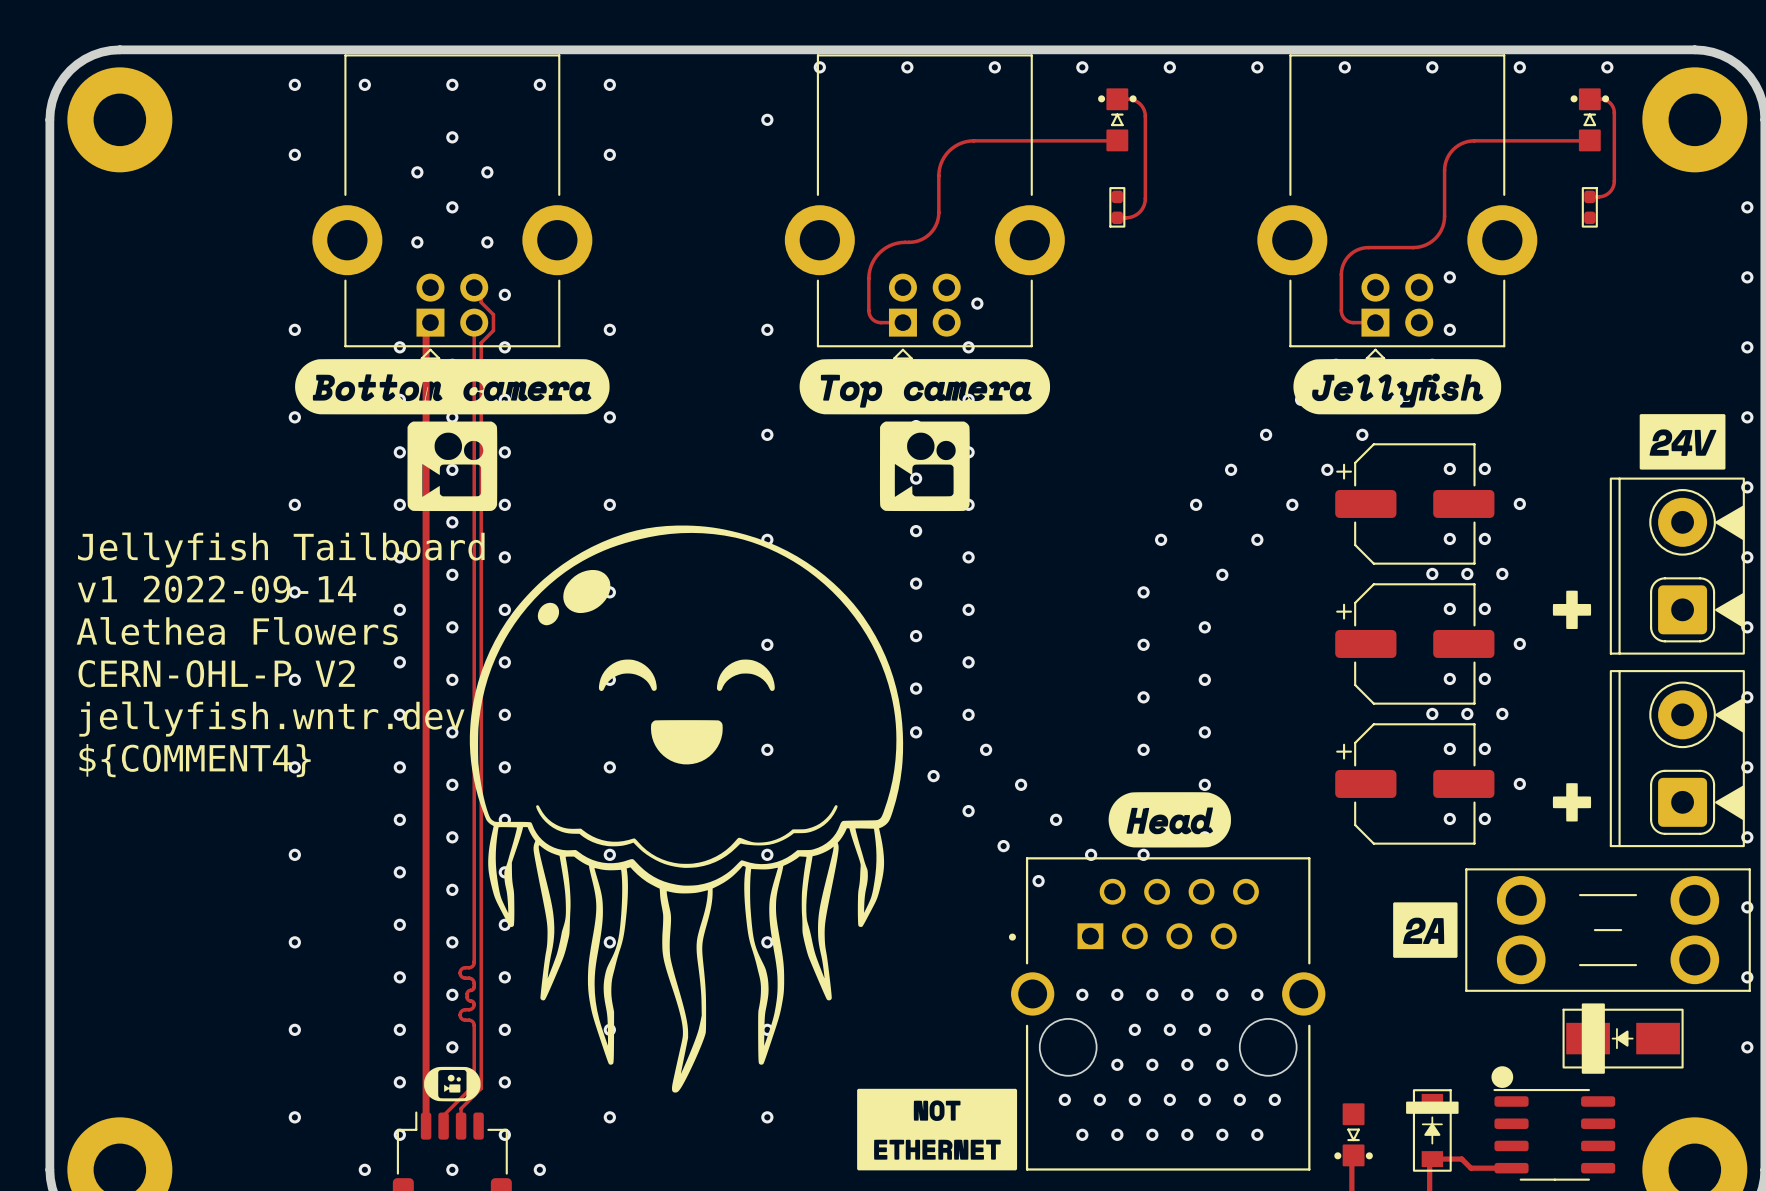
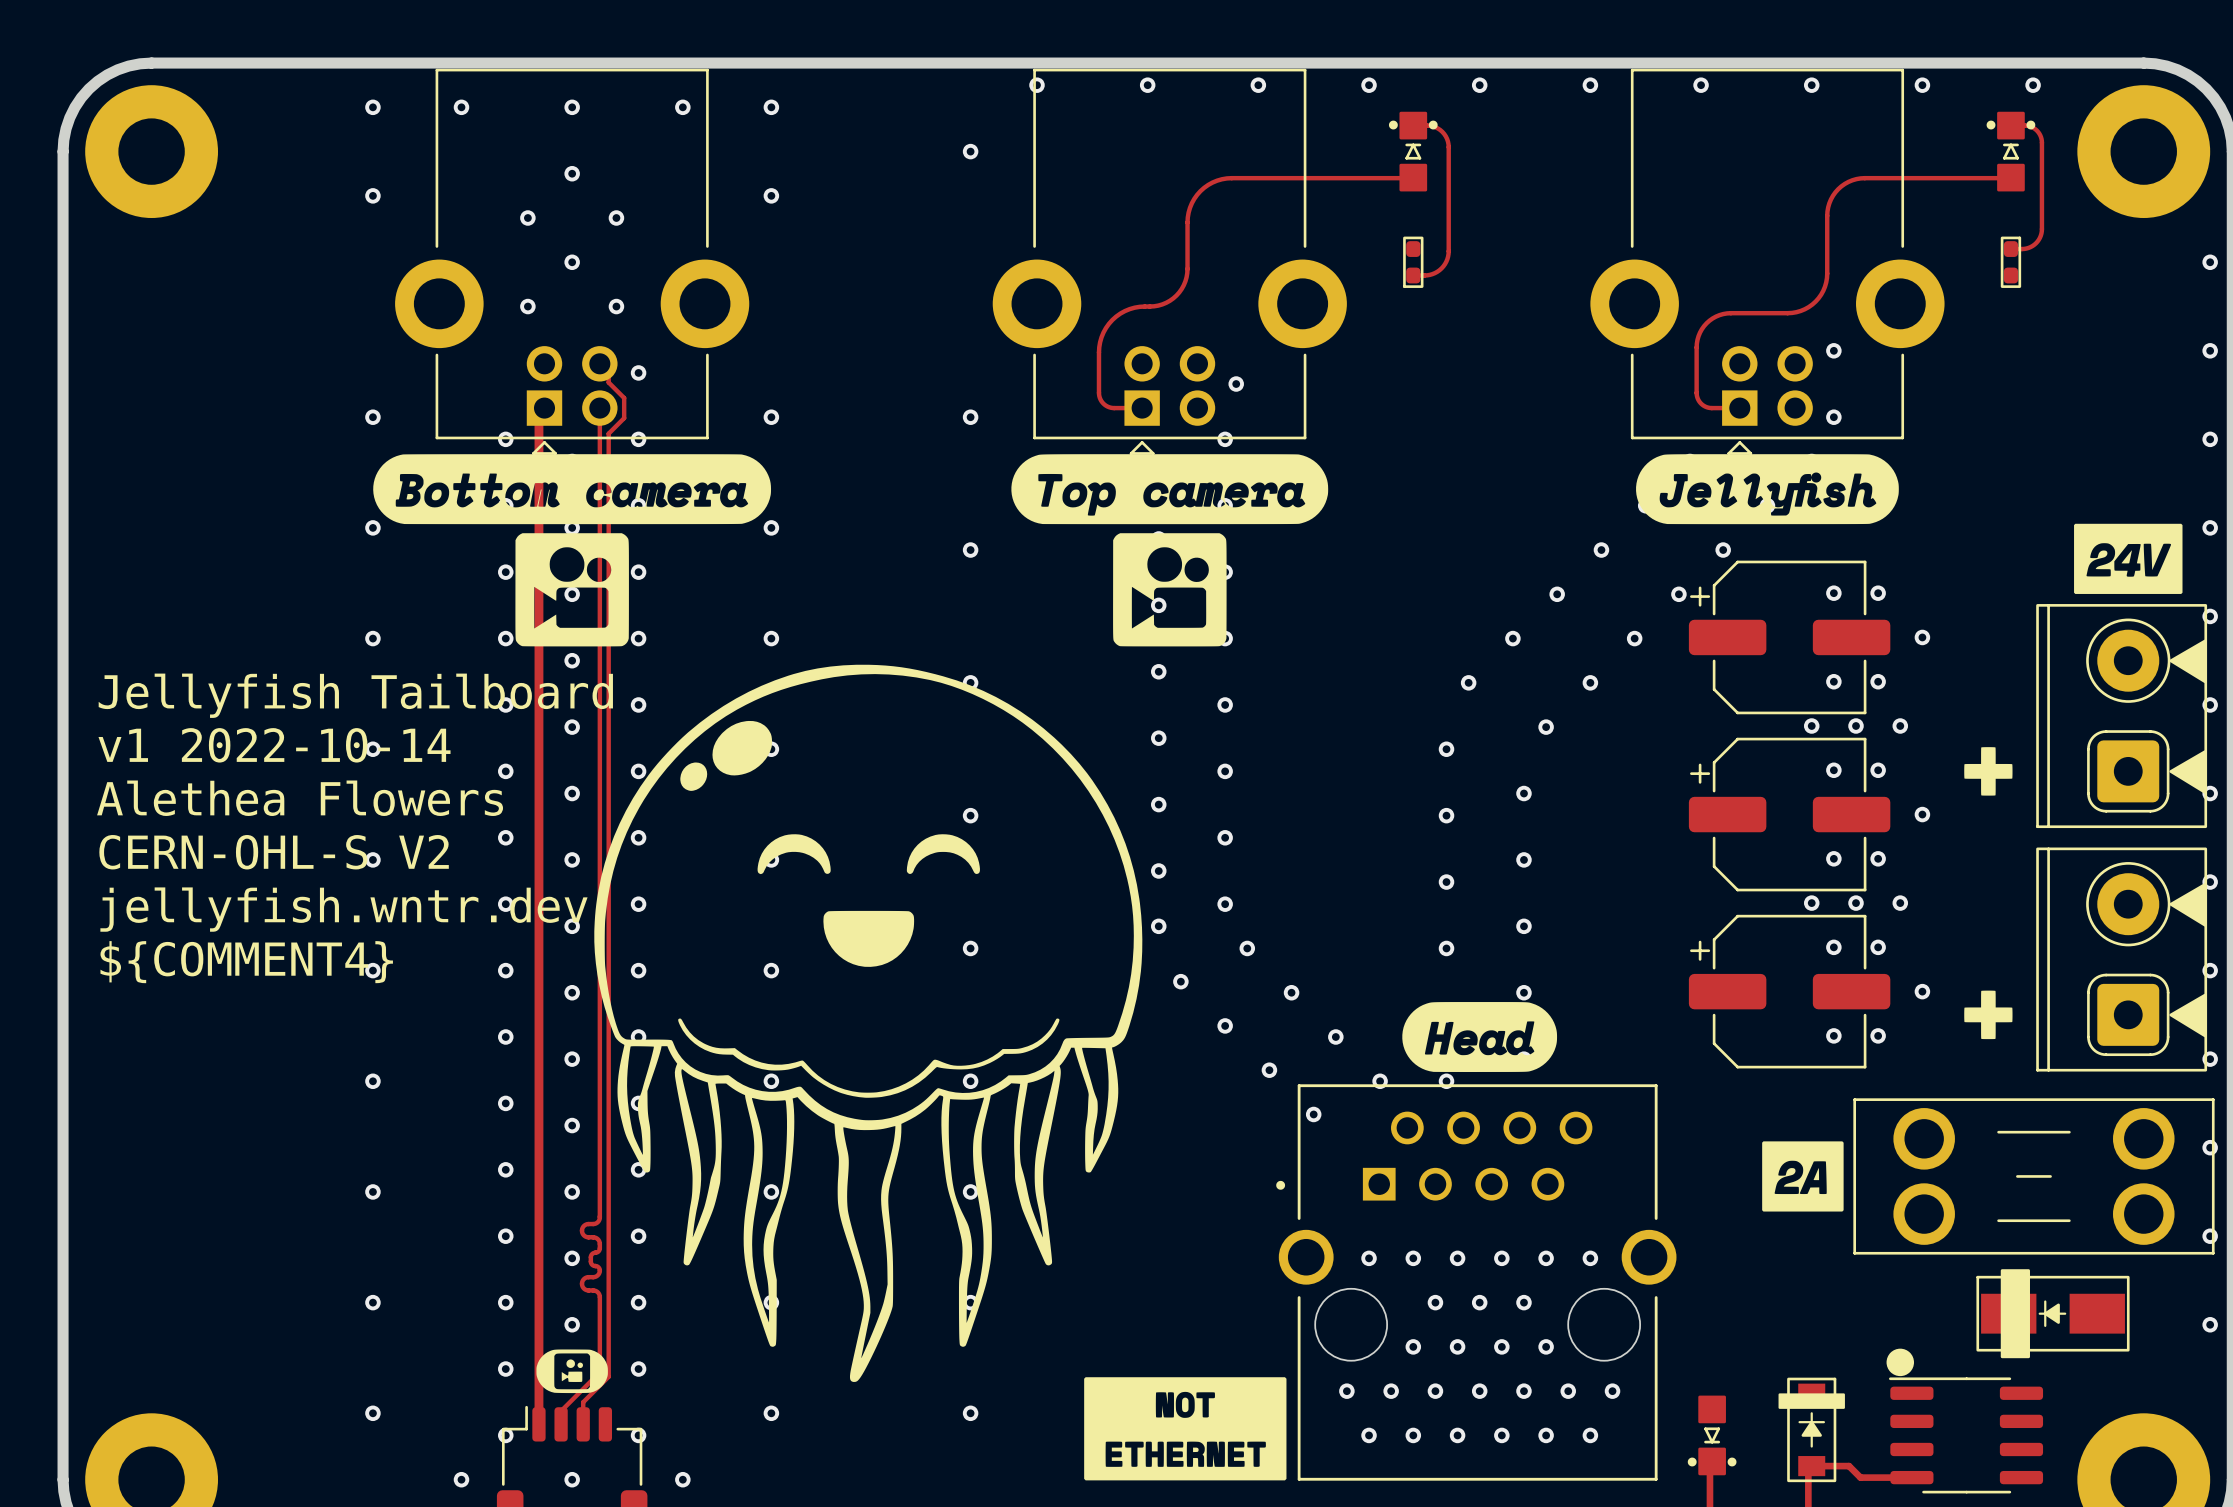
text: v1 2022-09-14 (217, 589) -> v1 2022-10-14 (274, 745)
text: CERN-OHL-P V2 (216, 673) -> CERN-OHL-S V2 (274, 852)

